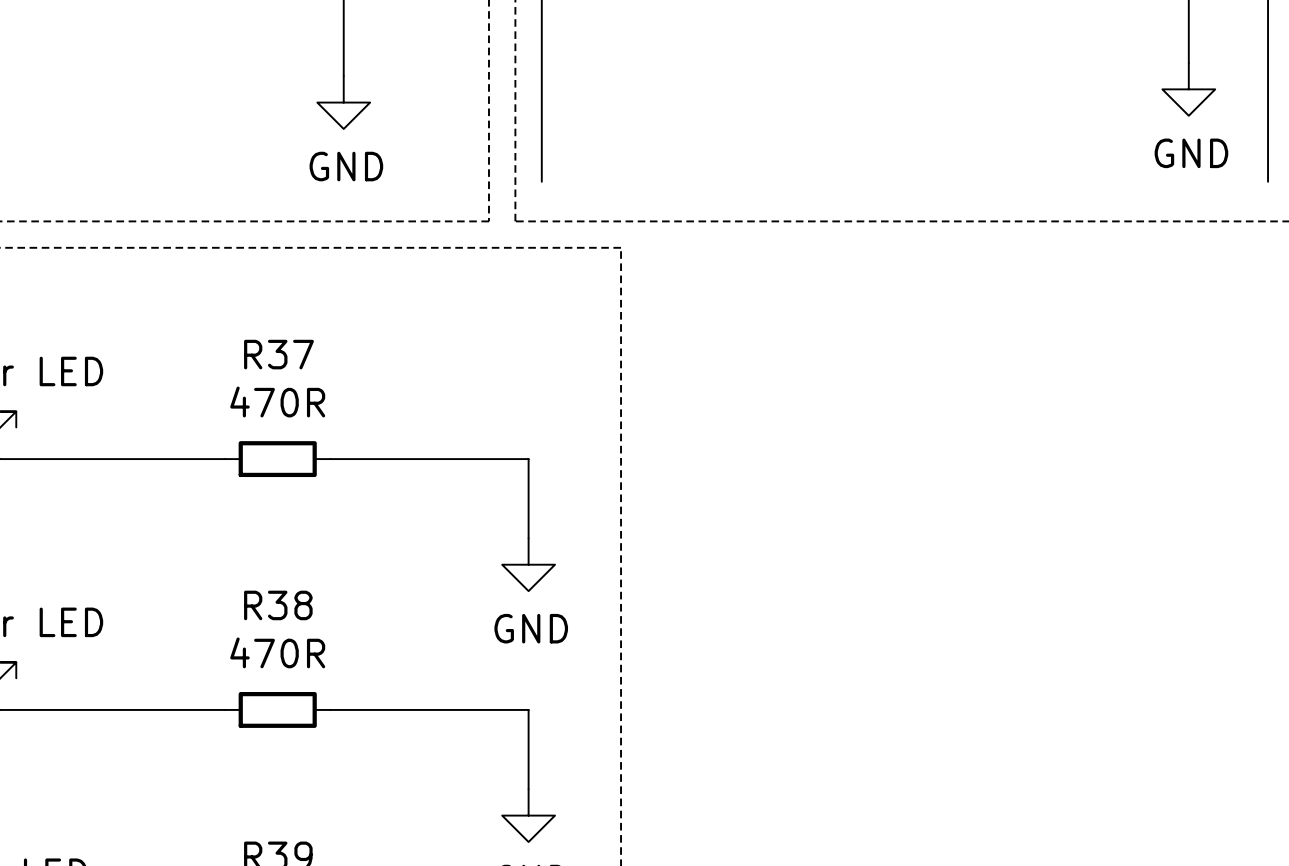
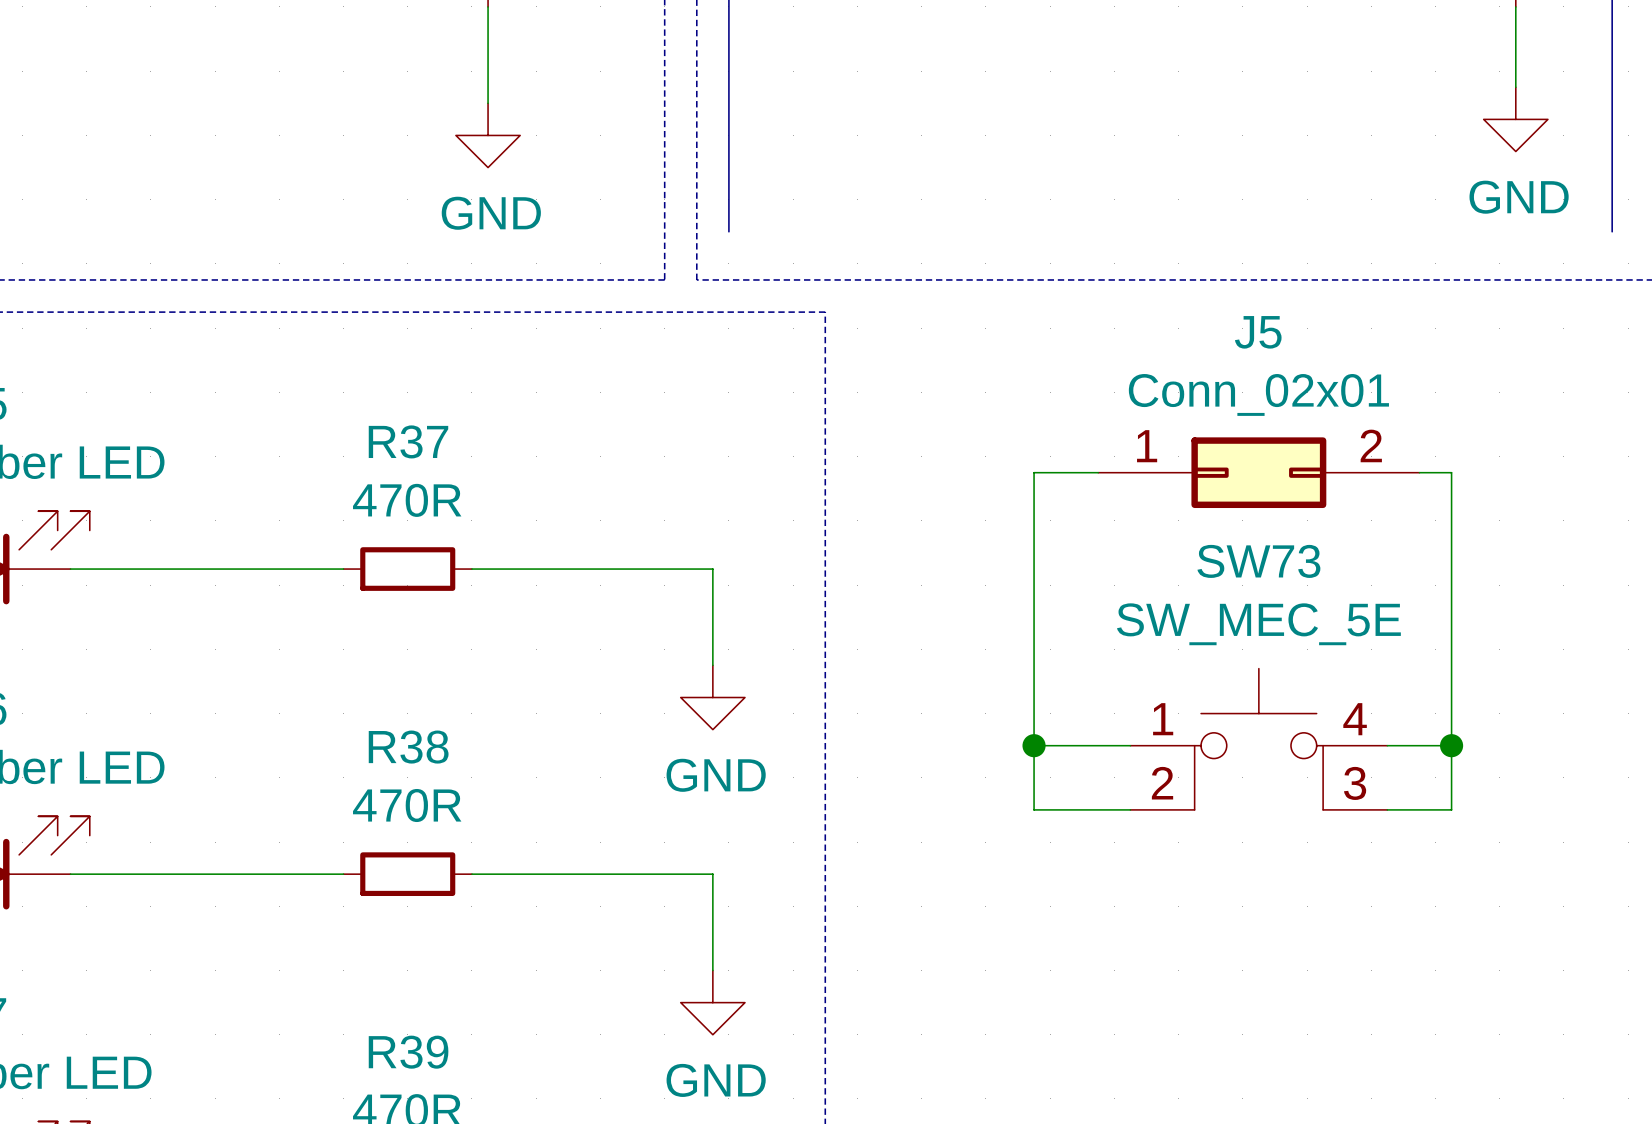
wire: none -> (1098, 472) (1034, 472) (1034, 809) (1130, 809)
J5: none -> Conn_02x01 (1258, 472)
wire: none -> (1419, 472) (1451, 472) (1451, 809) (1387, 809)
SW73: none -> SW_MEC_5E (1258, 739)
wire: none -> (1034, 745) (1130, 745)
junction: none -> (1034, 745)
wire: none -> (1387, 745) (1451, 745)
junction: none -> (1451, 745)

